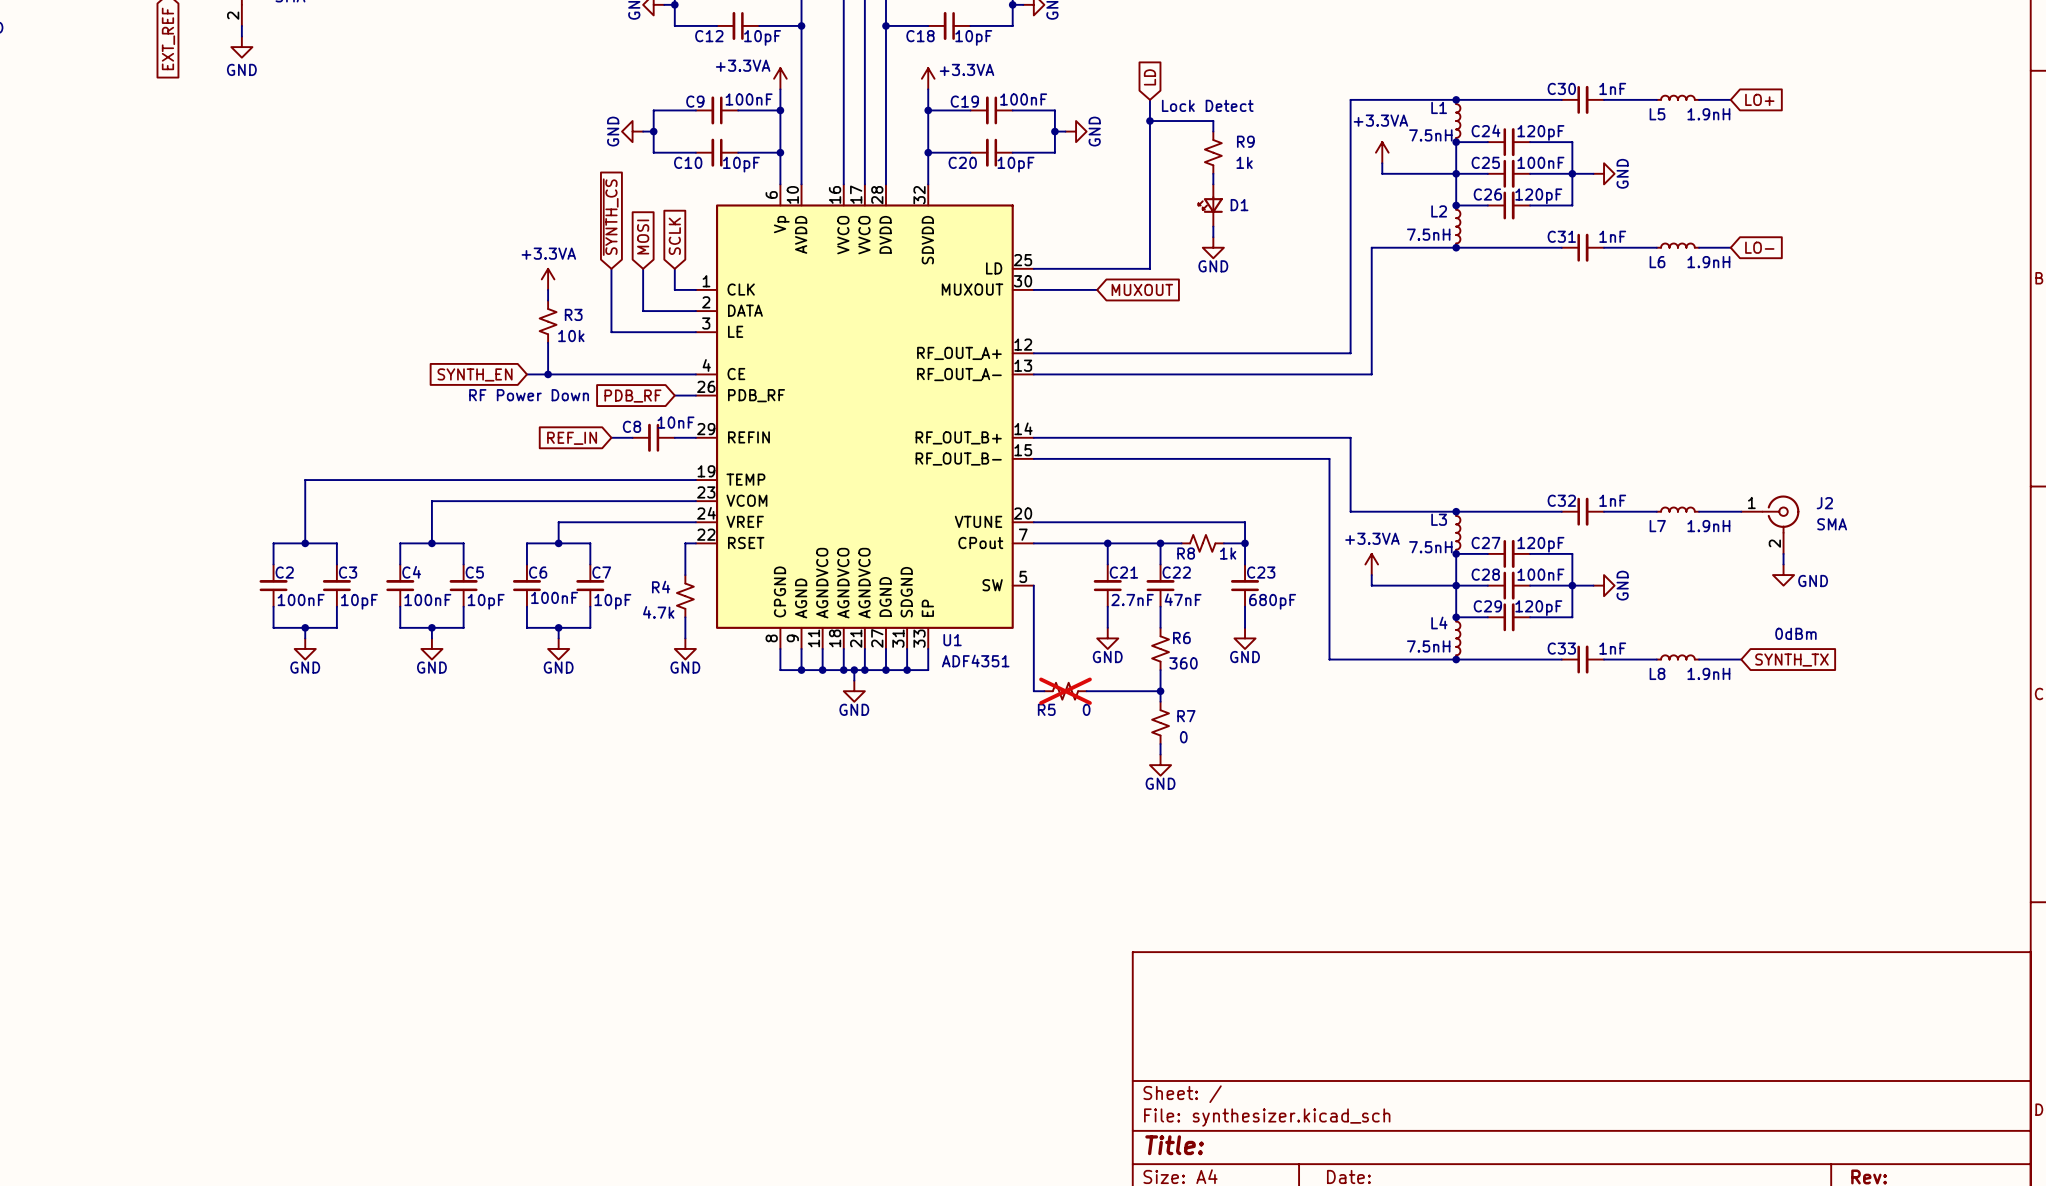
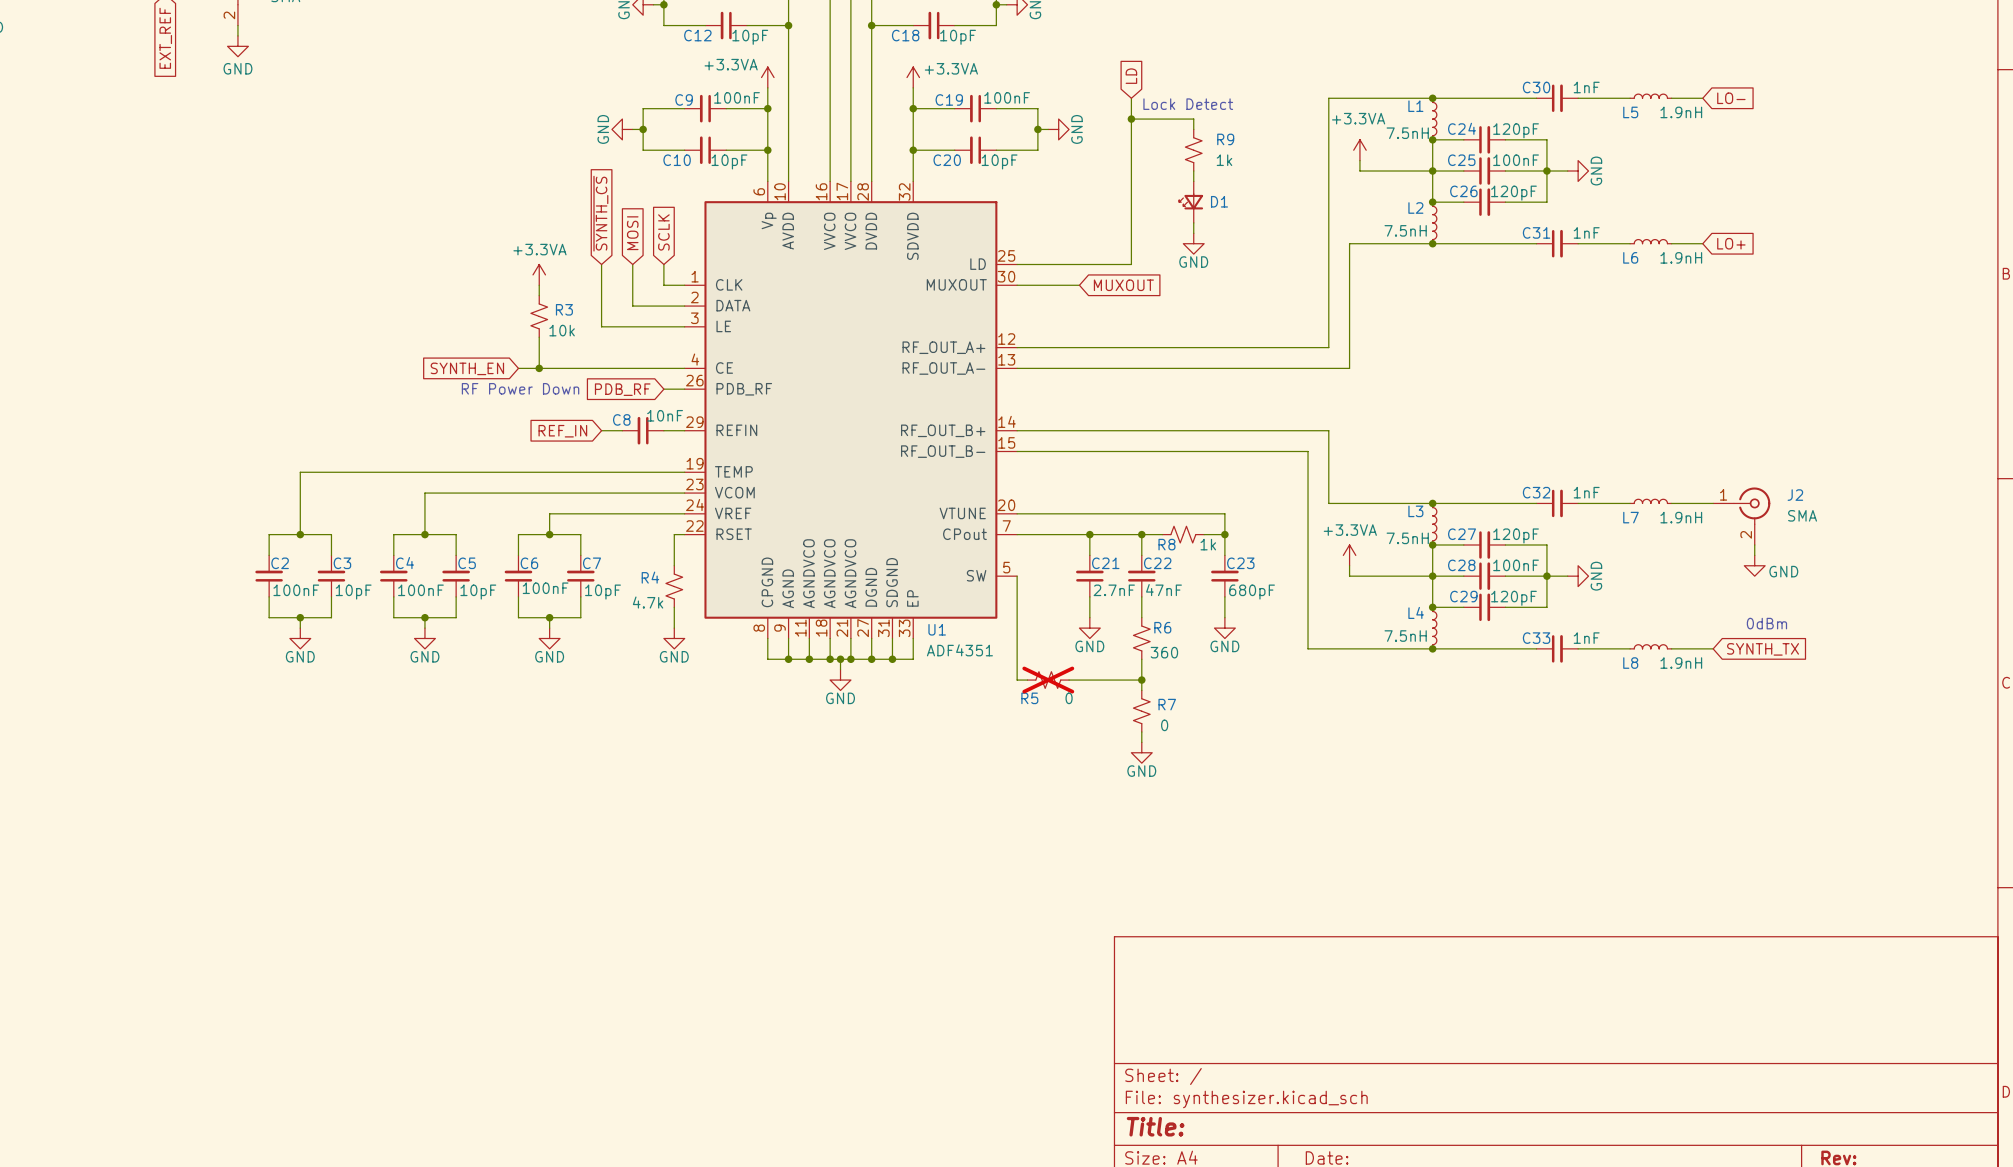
global label: LO+ (1759, 99) -> LO- (1731, 98)
global label: LO- (1759, 247) -> LO+ (1731, 243)

